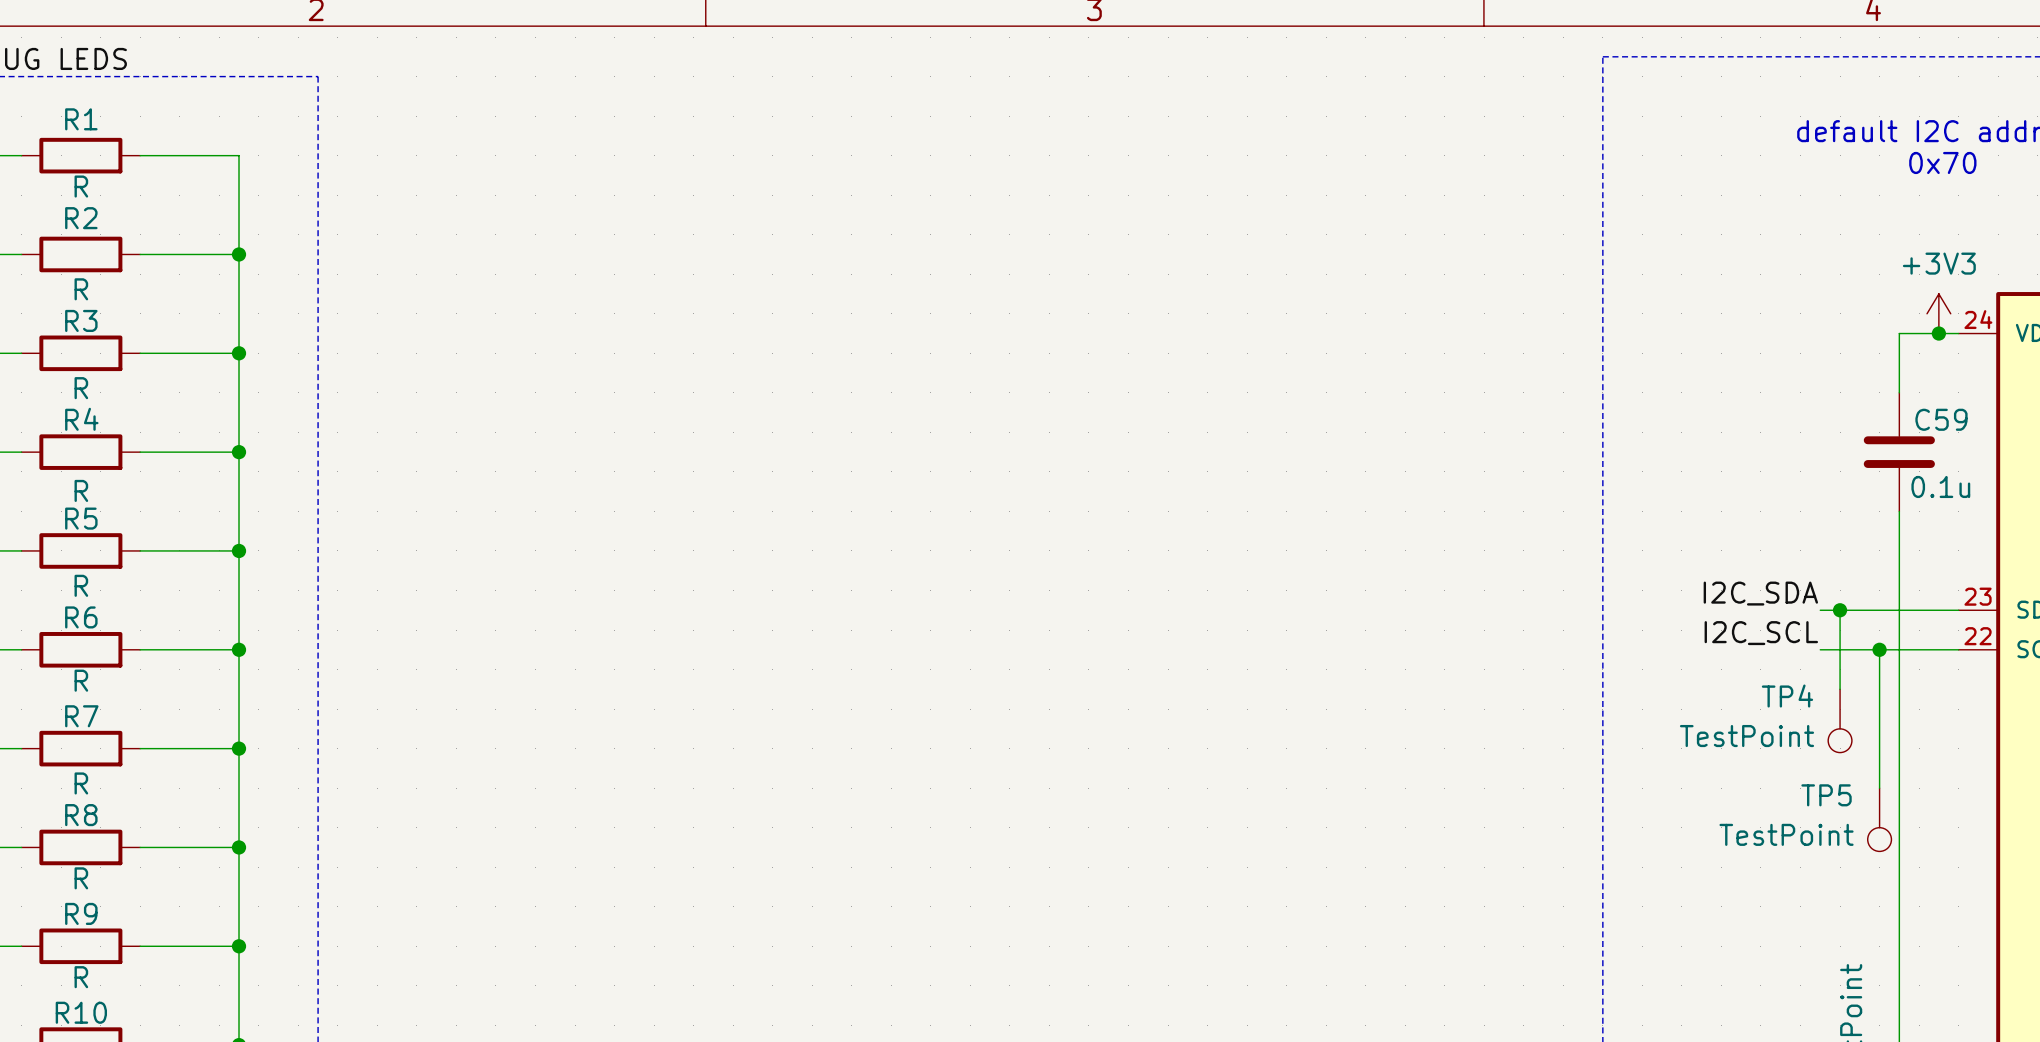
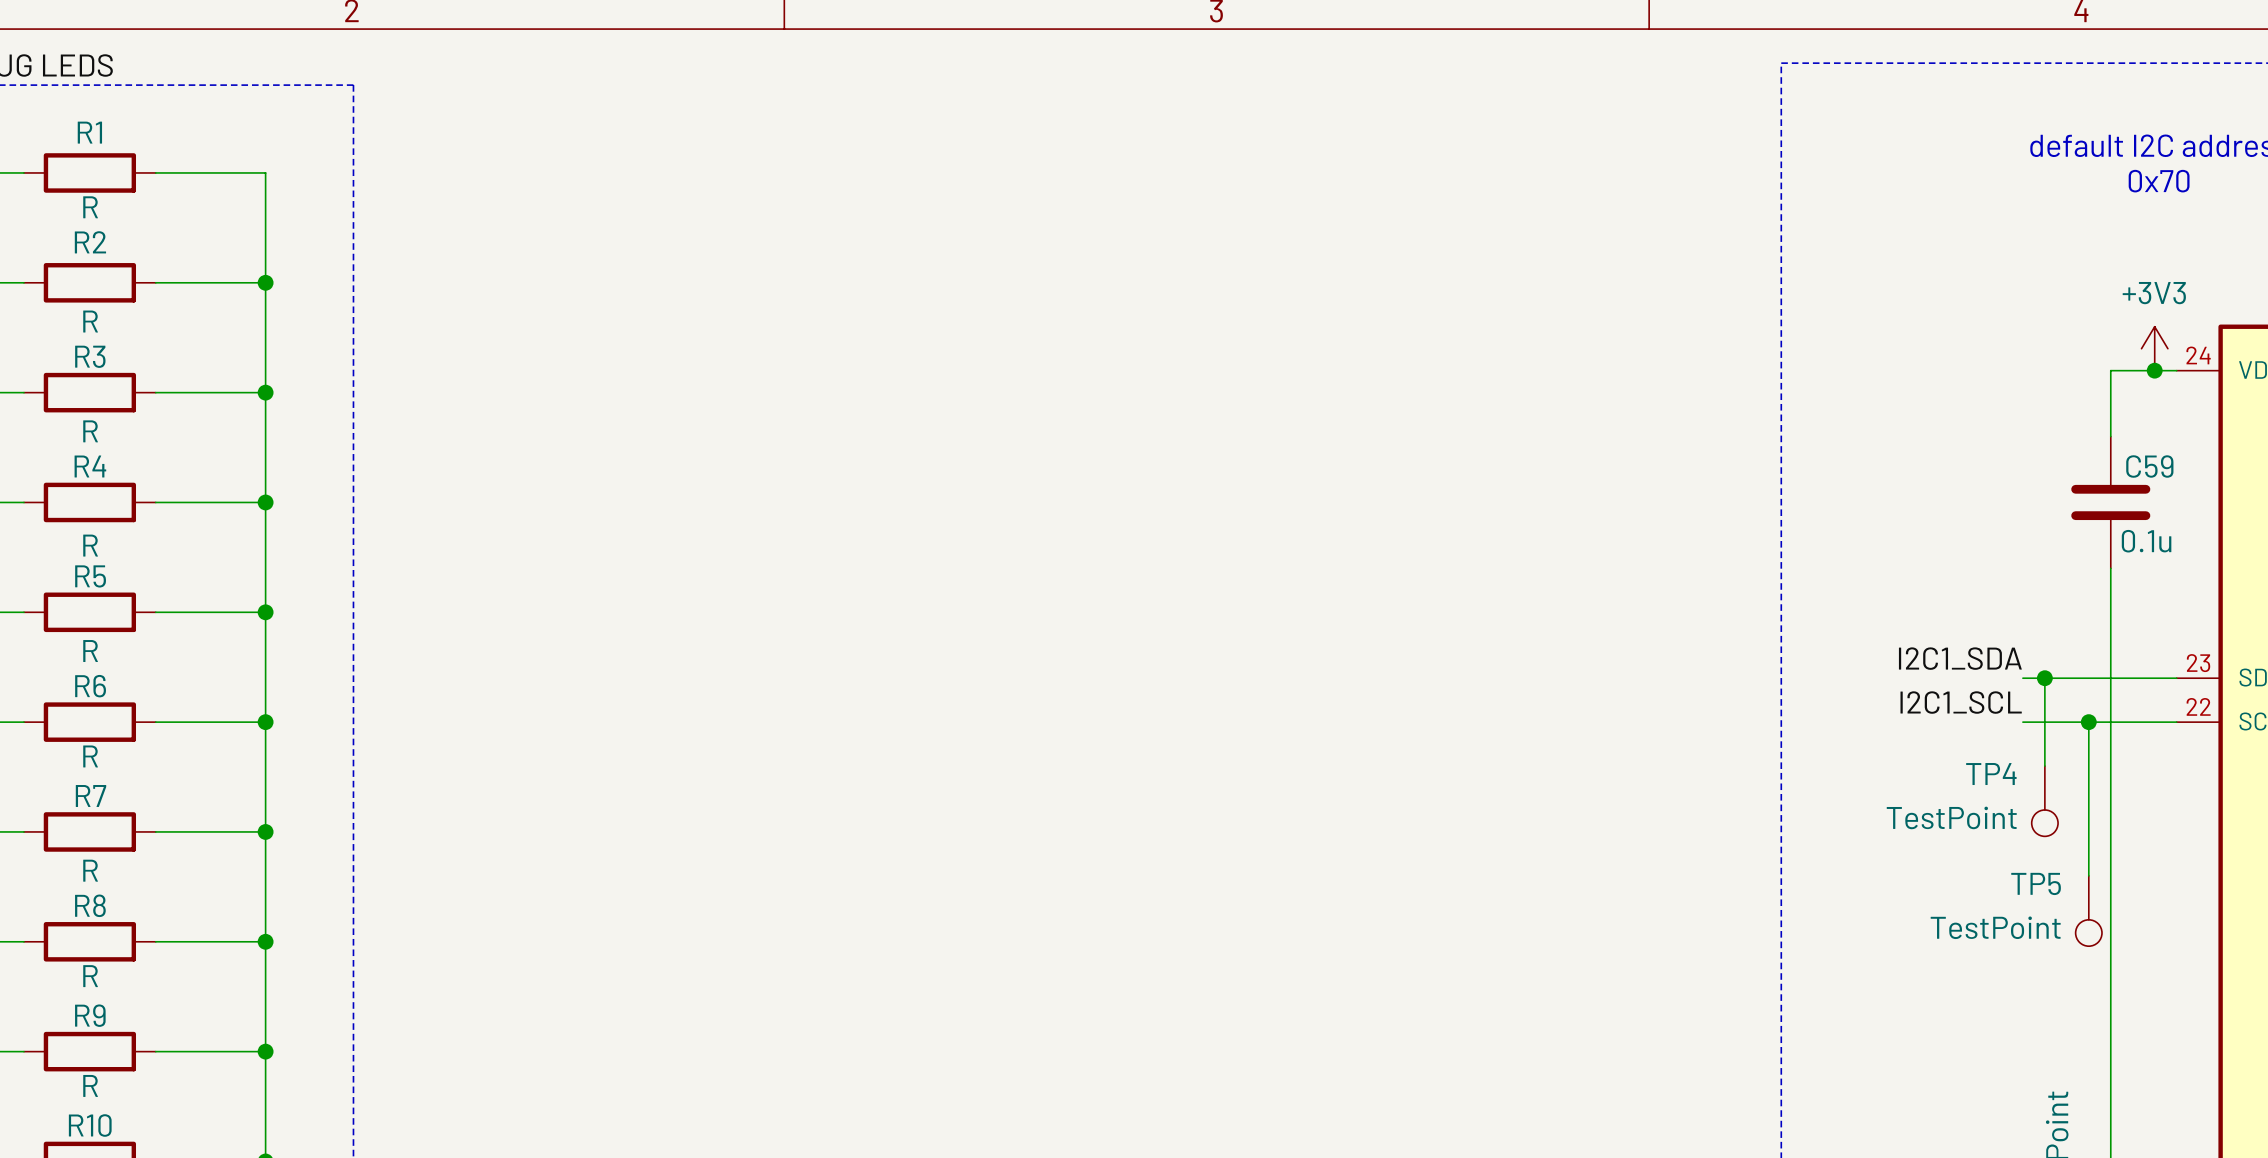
label: I2C_SDA (1760, 593) -> I2C1_SDA (1960, 658)
label: I2C_SCL (1761, 633) -> I2C1_SCL (1961, 702)

